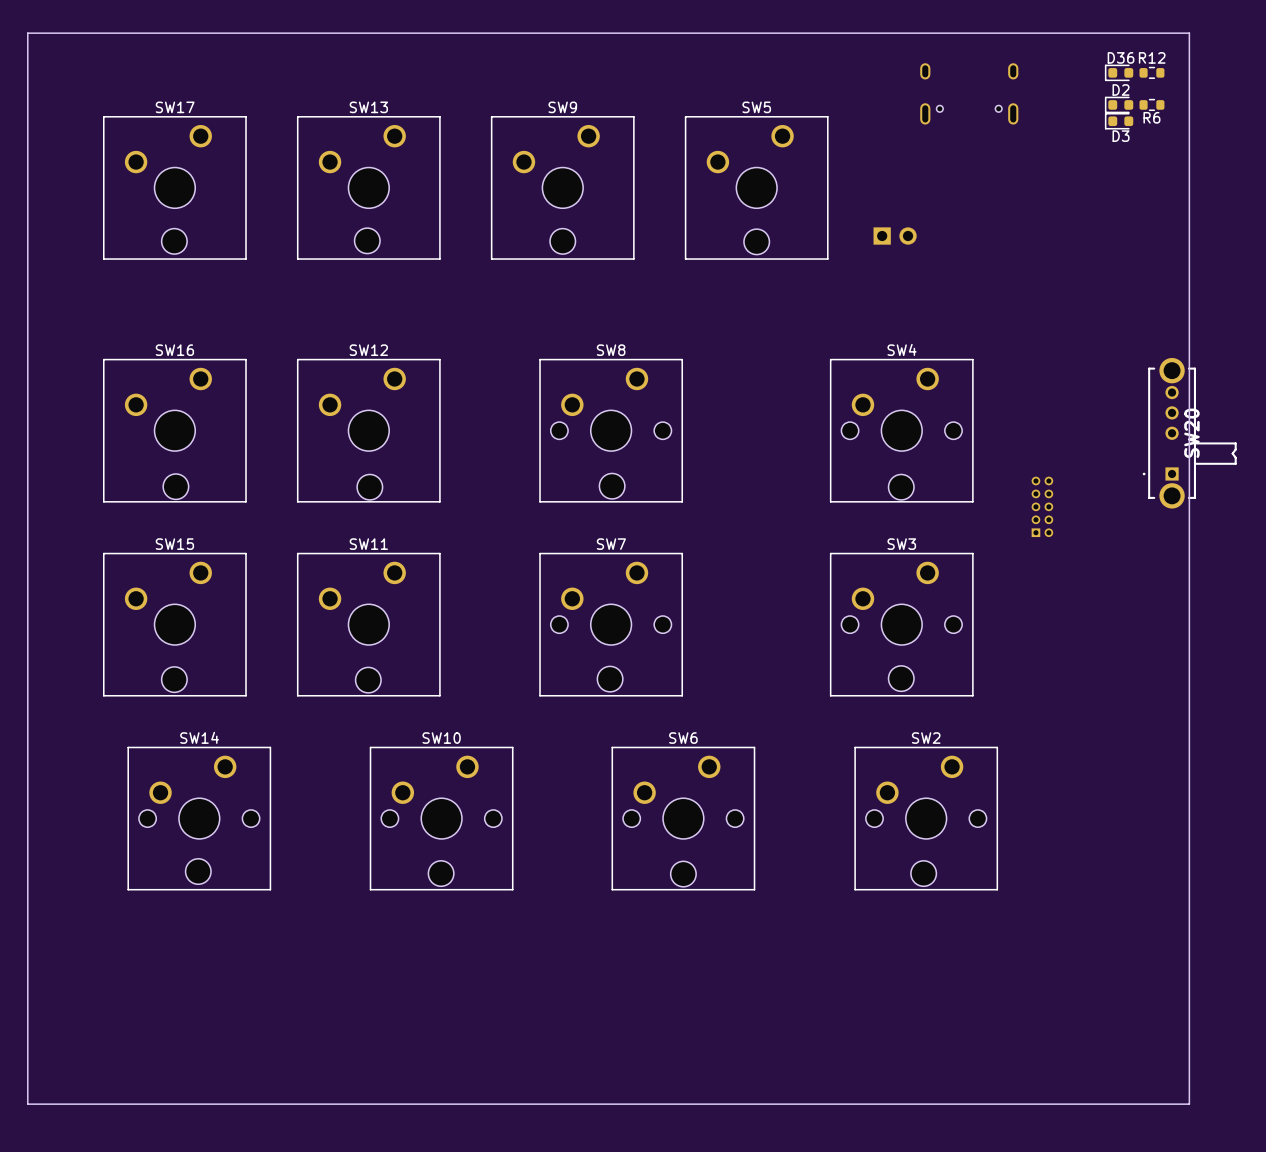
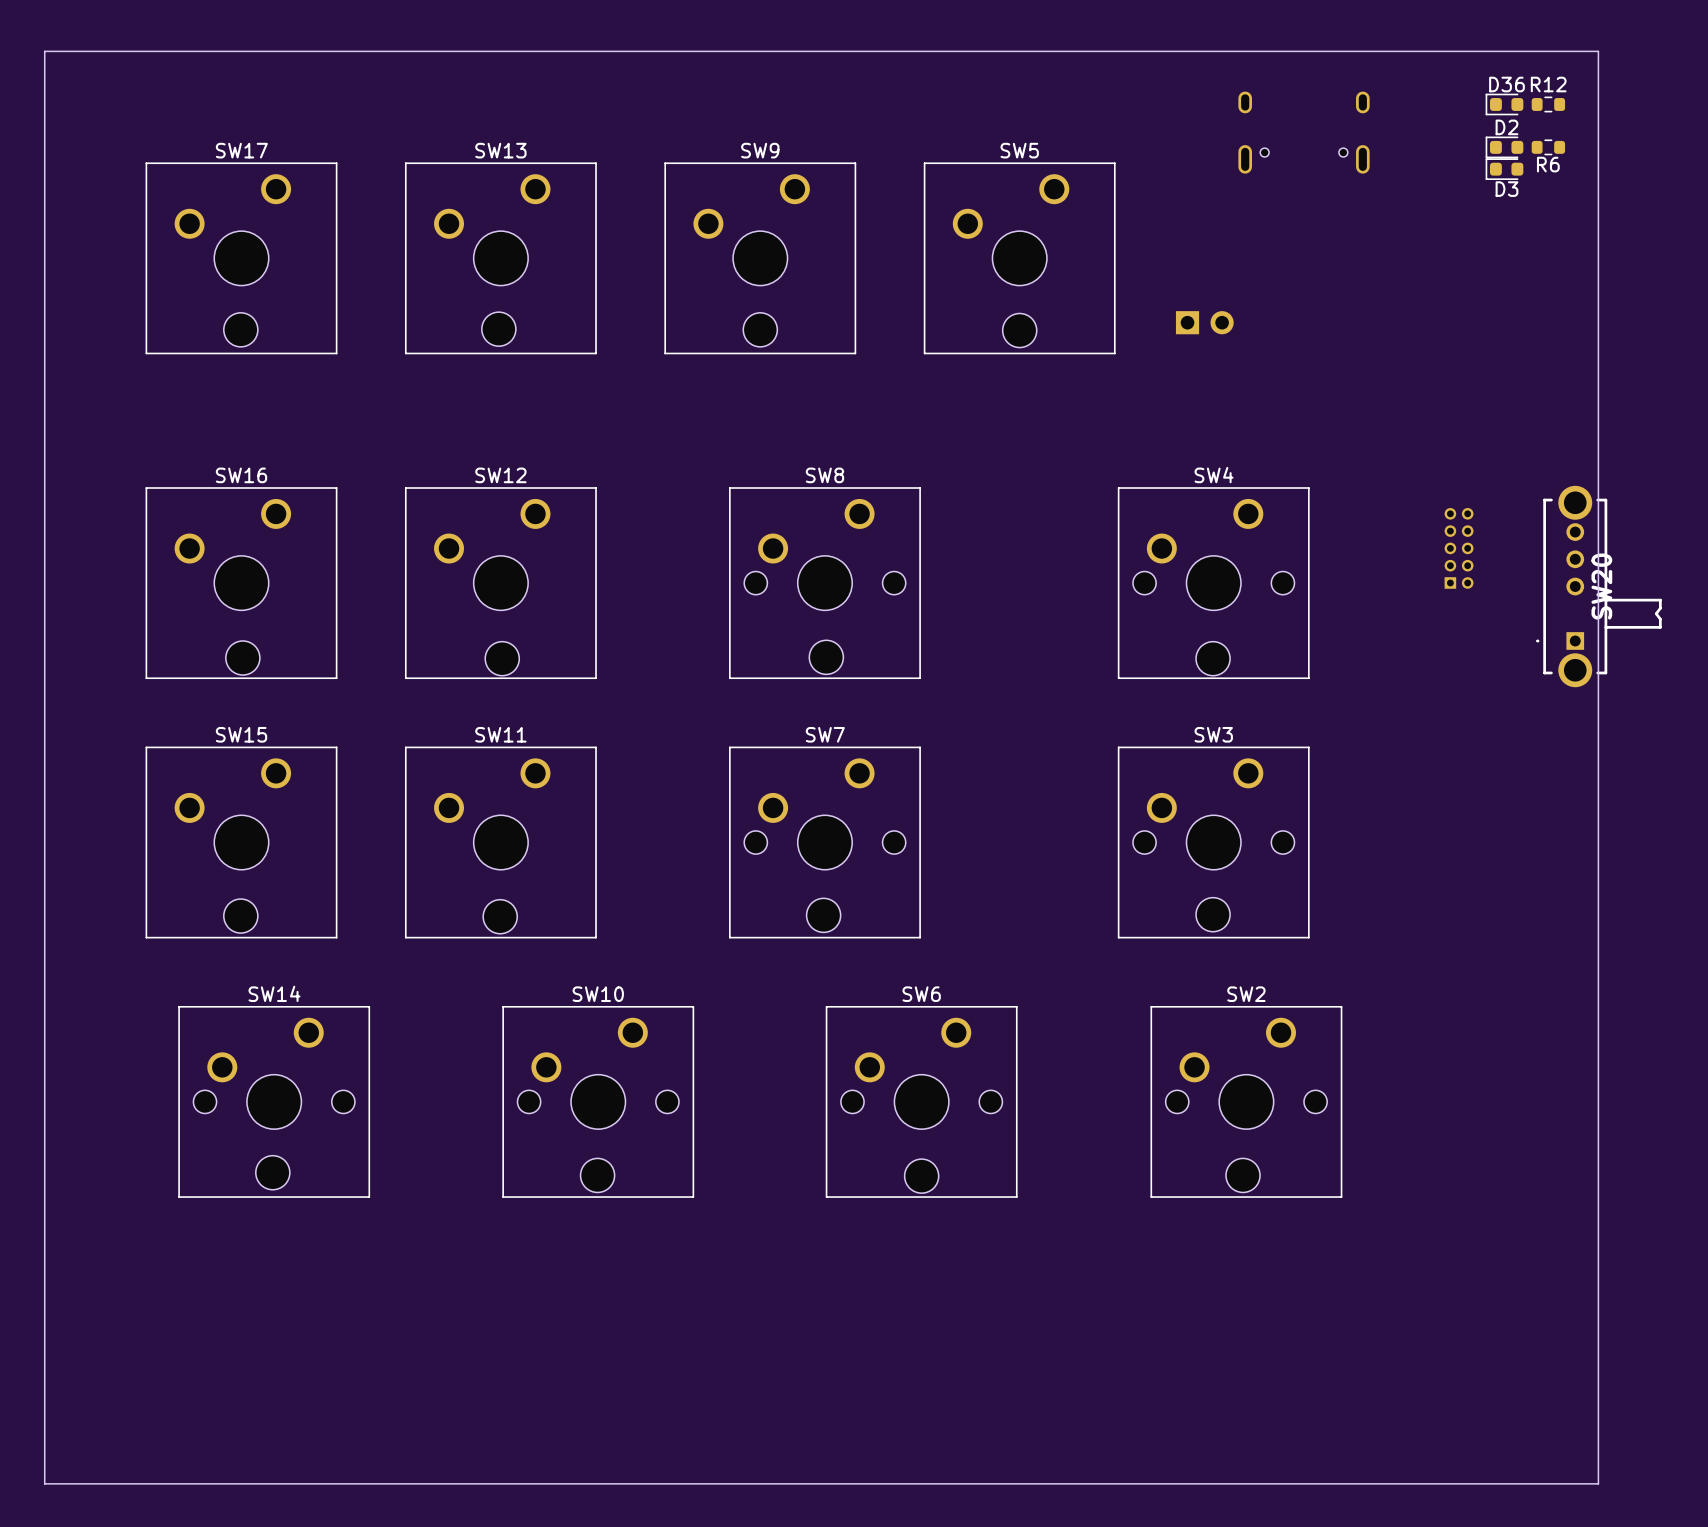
part position: (1042, 506) -> (1459, 548)

